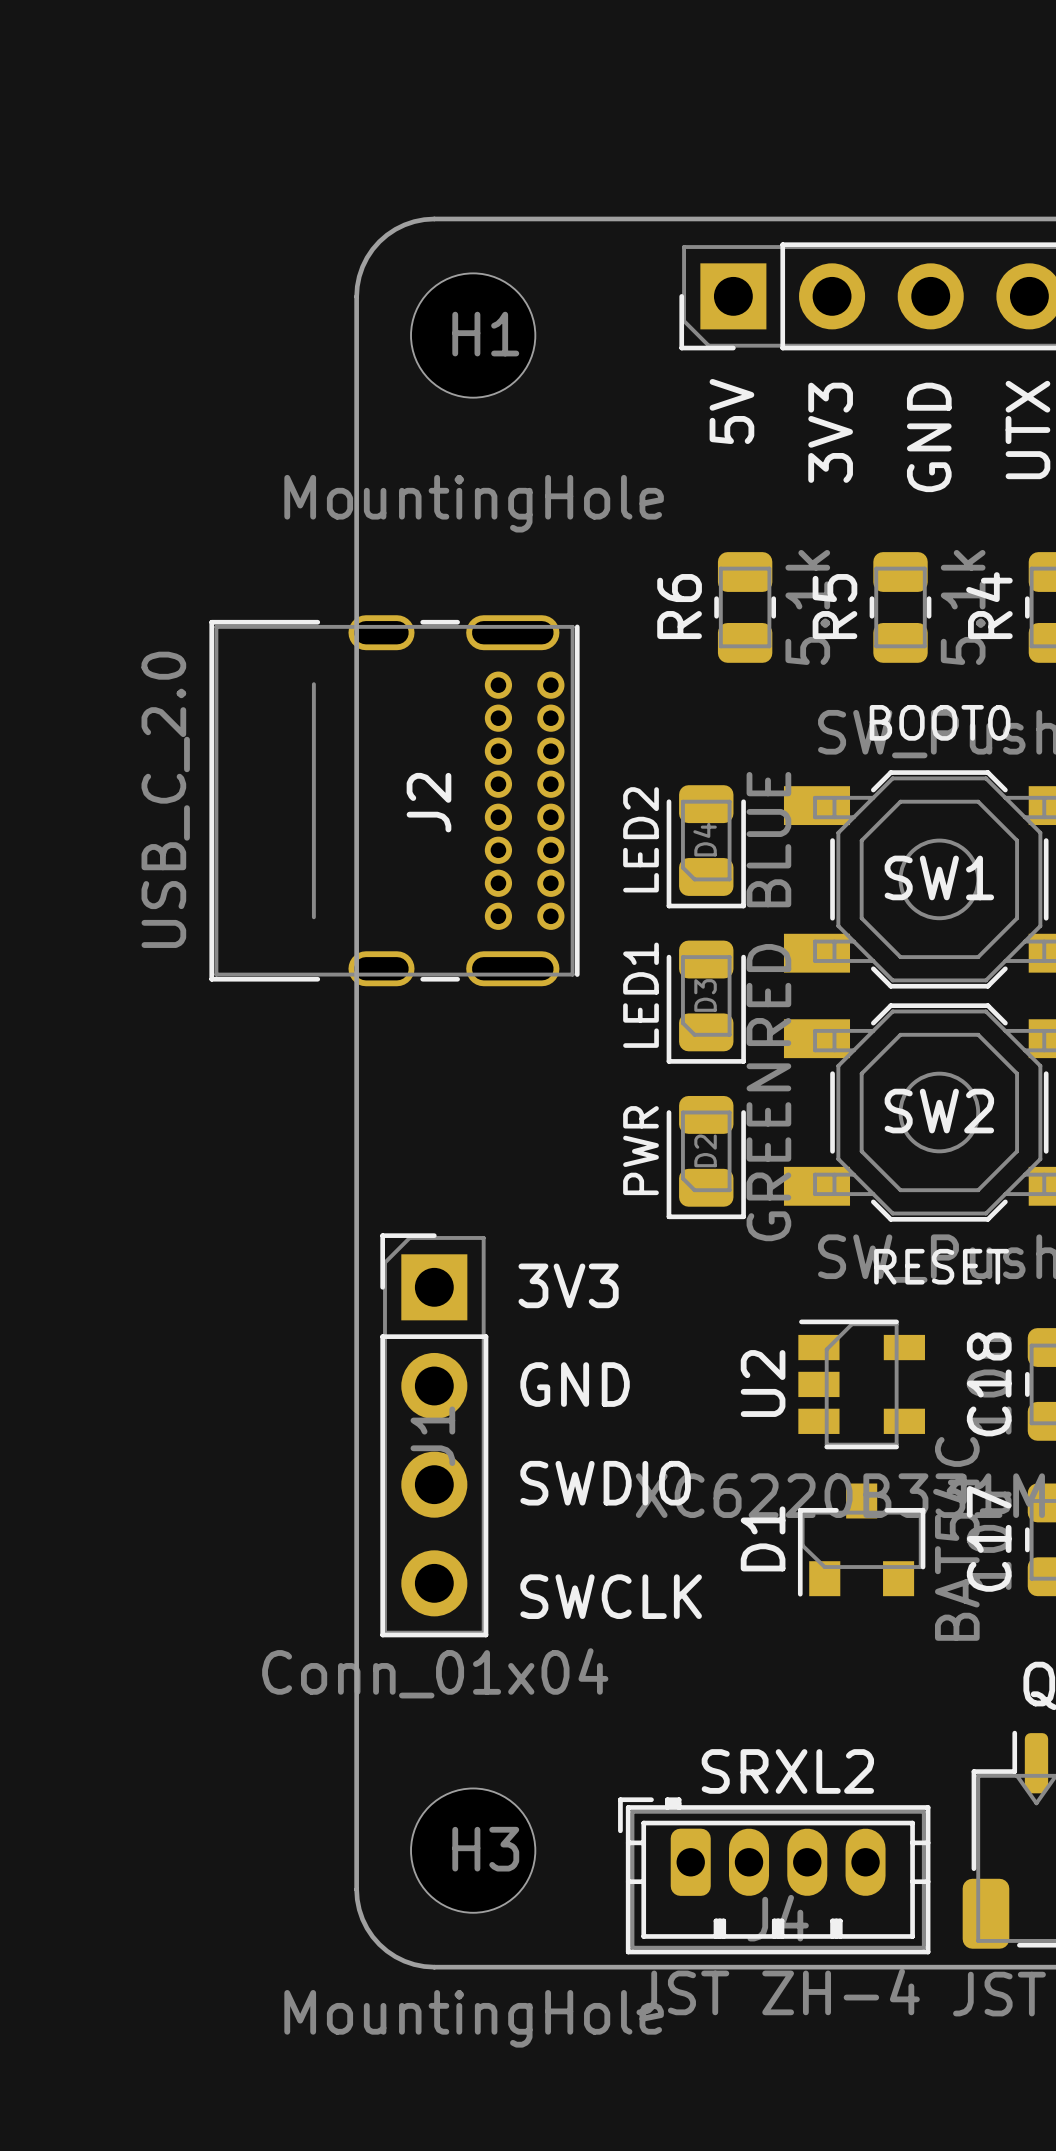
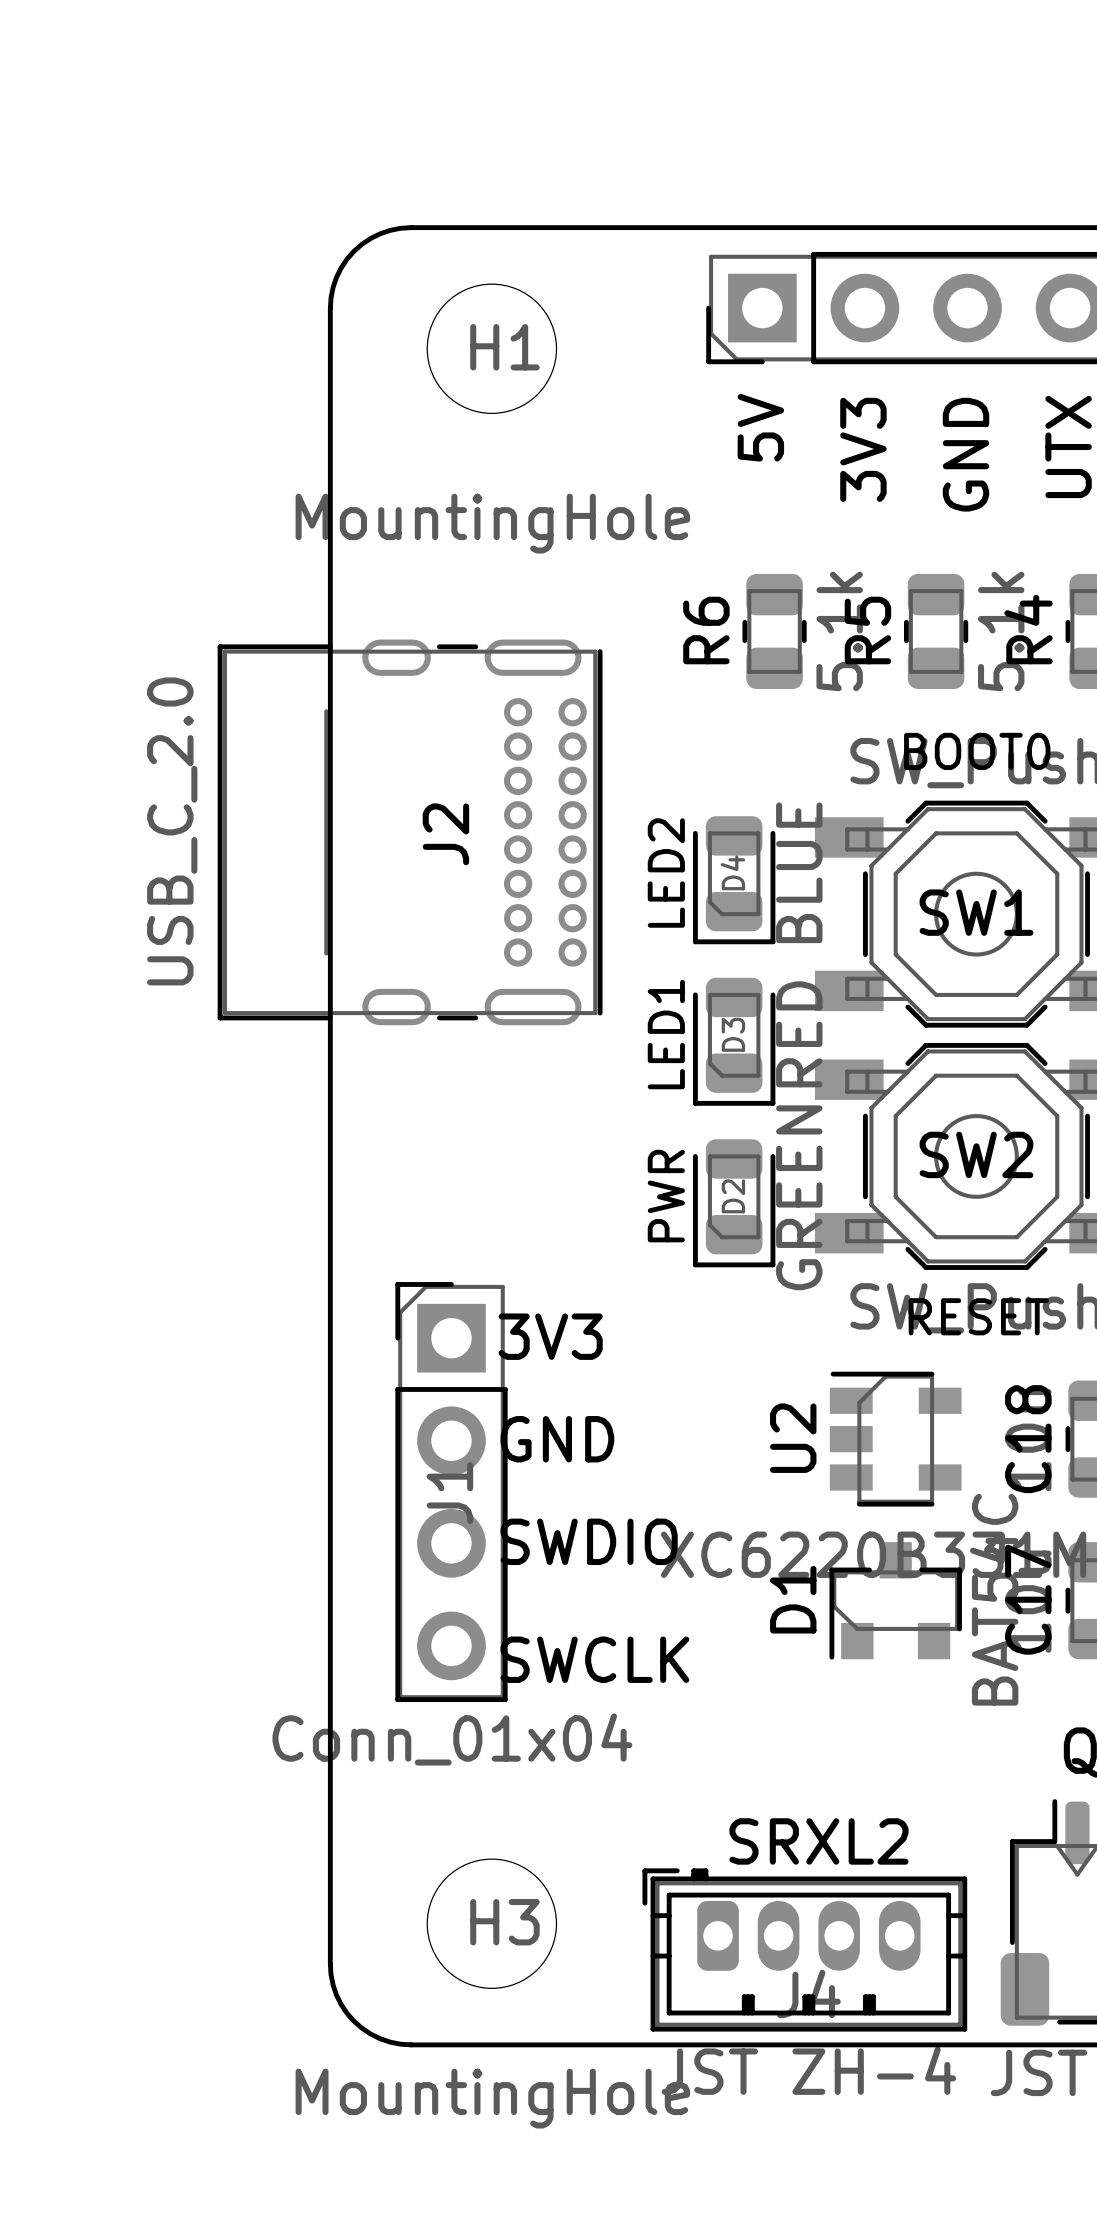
board edge: (434, 218) (404, 224) (379, 241) (362, 266) (356, 296) (356, 1889) (362, 1919) (379, 1944) (404, 1961) (434, 1967) -> (451, 227) (400, 228) (370, 238) (353, 251) (341, 268) (333, 287) (330, 308) (331, 1974) (341, 2004) (353, 2021) (370, 2034) (400, 2044) (451, 2044)
text position: 3V3 (568, 1285) -> 3V3 (550, 1336)
text position: GND (575, 1384) -> GND (557, 1439)
text position: SWDIO (605, 1483) -> SWDIO (589, 1541)
text position: SWCLK (611, 1596) -> SWCLK (594, 1659)

